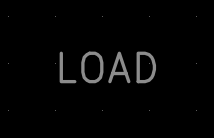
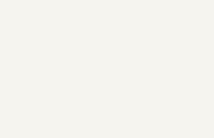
text: LOAD (107, 67) -> none

